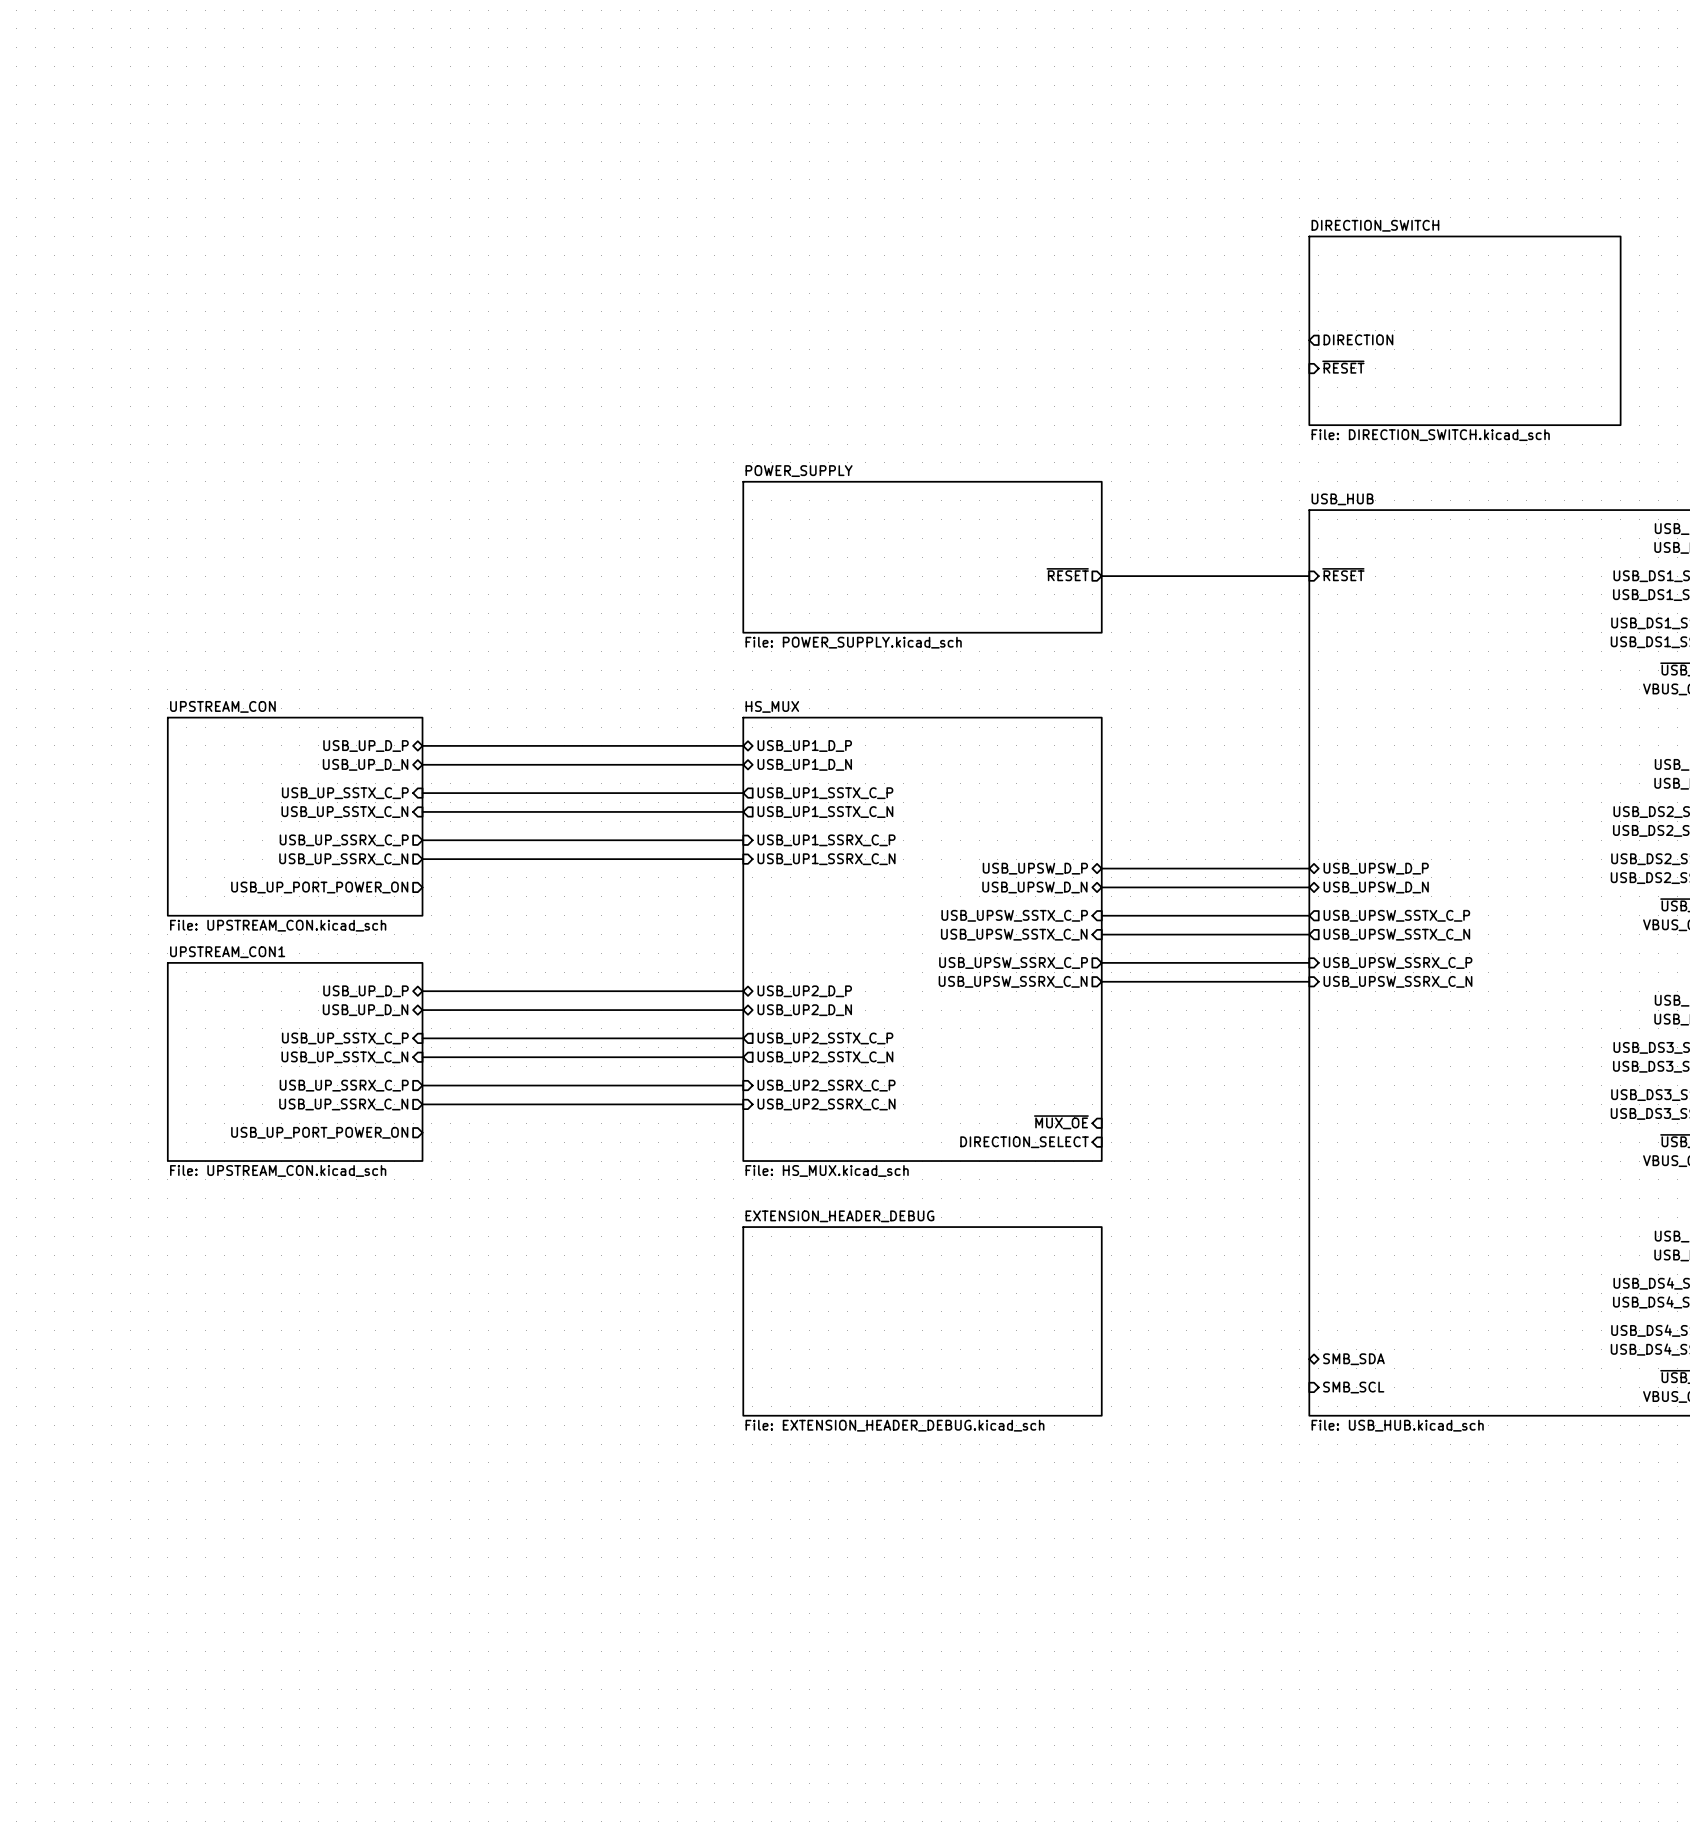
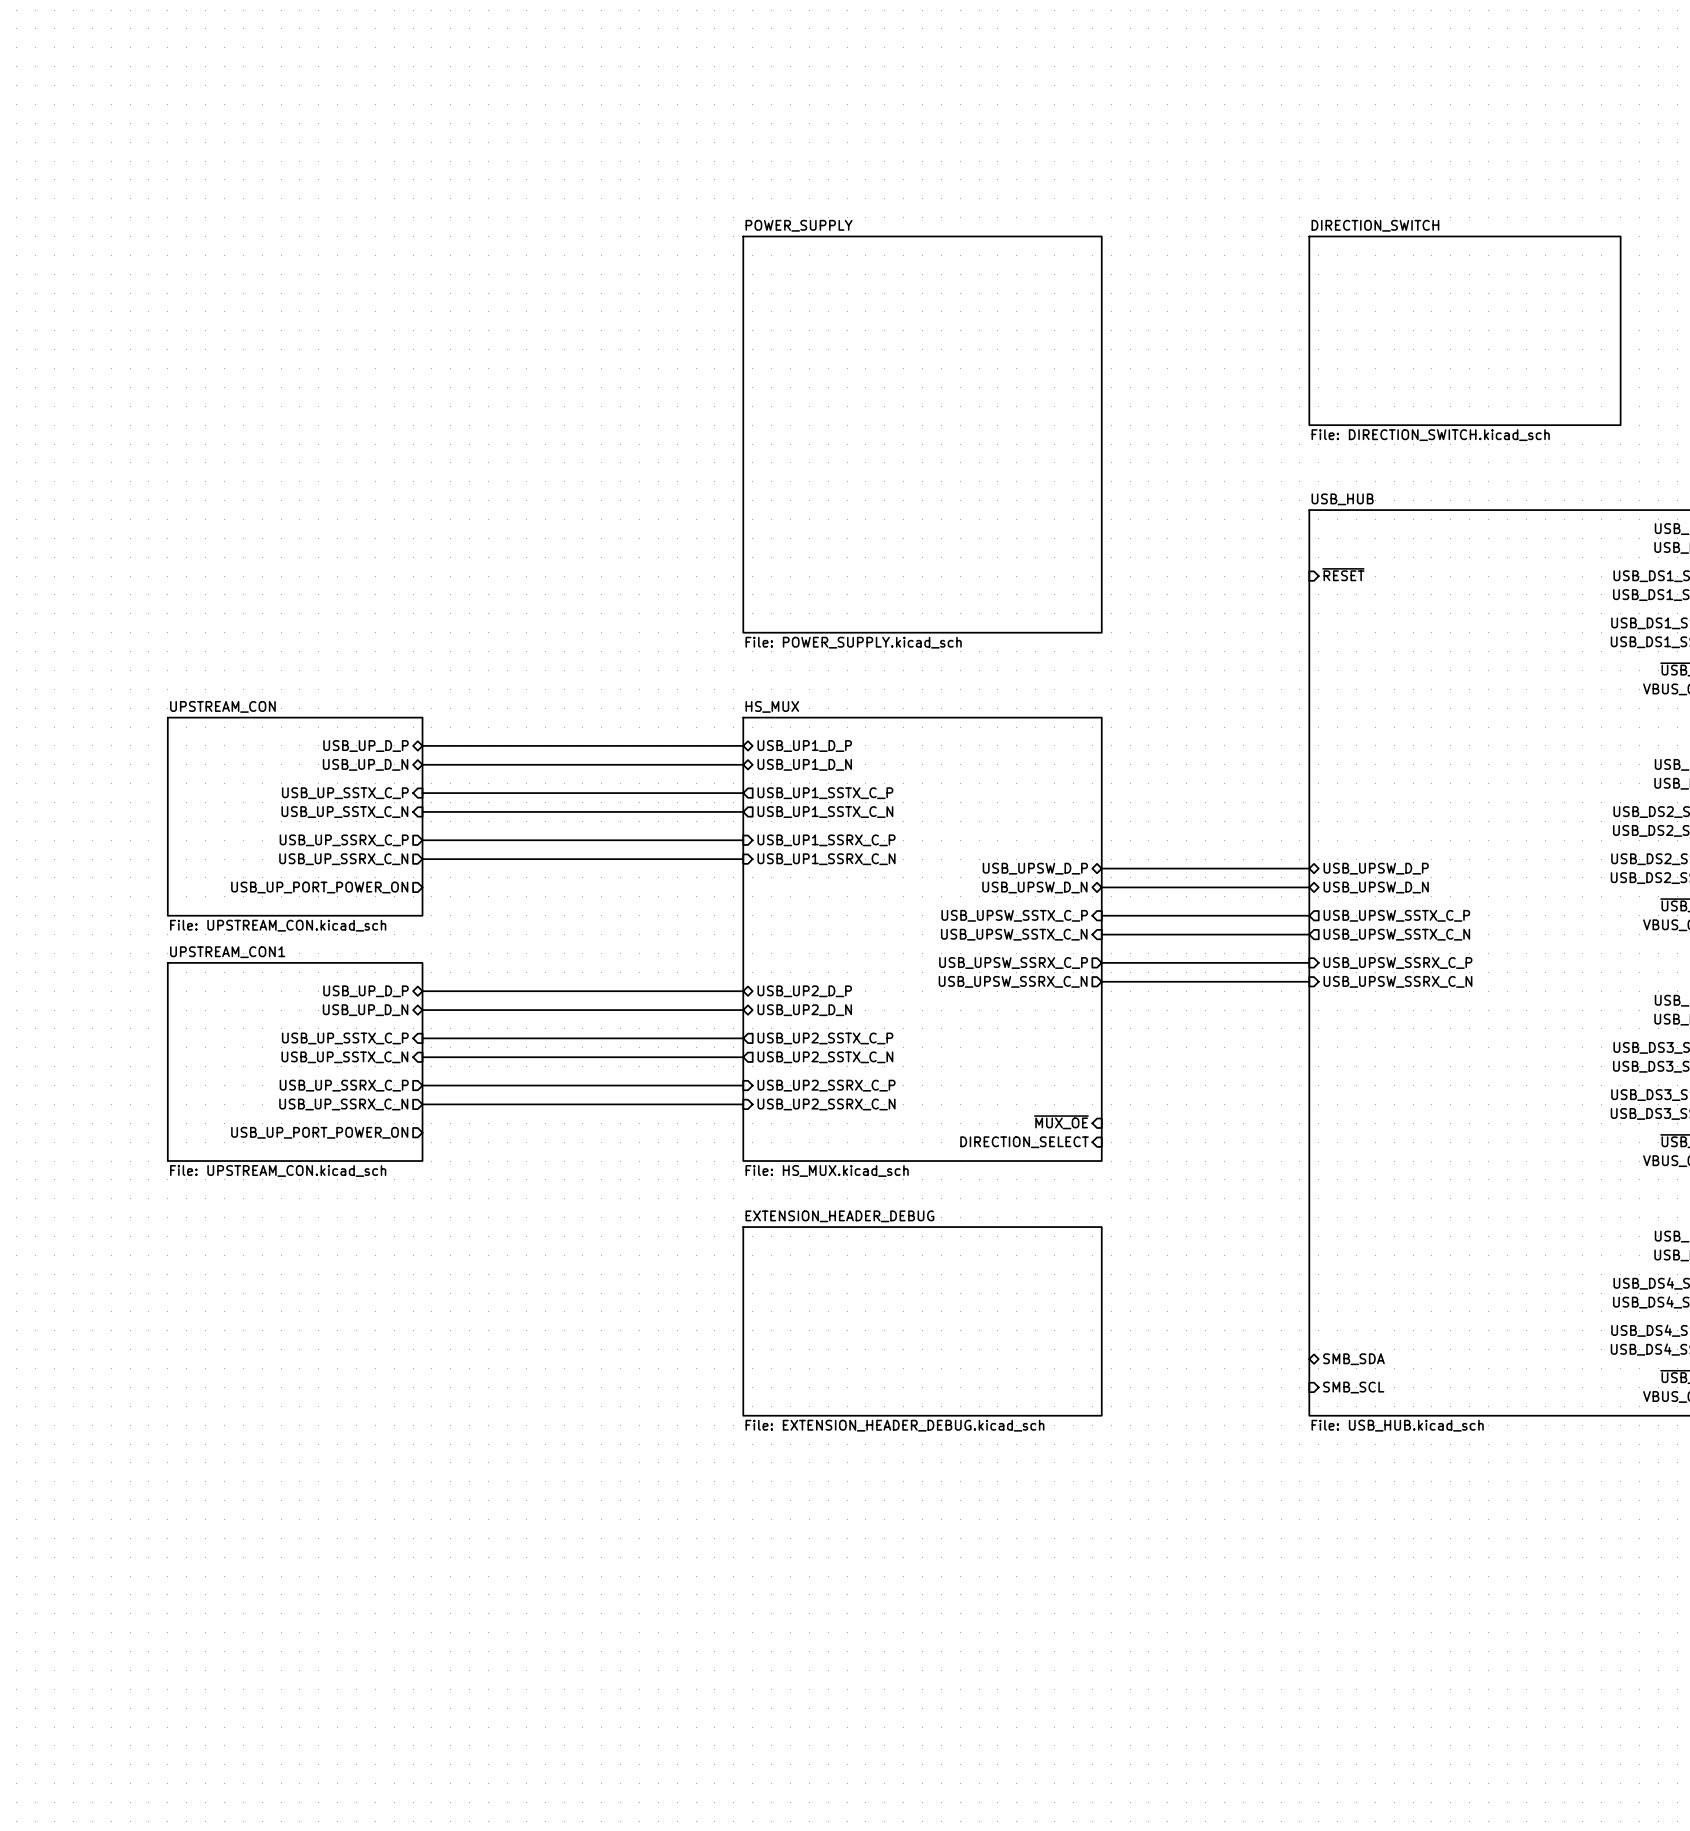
sheet pin: DIRECTION (1358, 339) -> none
sheet pin: ~{RESET} (1343, 367) -> none
sheet POWER_SUPPLY: none -> File: POWER_SUPPLY.kicad_sch (922, 434)
sheet POWER_SUPPLY: File: POWER_SUPPLY.kicad_sch (922, 557) -> none
sheet pin: ~{RESET} (1067, 574) -> none
wire: (1101, 576) (1309, 576) -> none

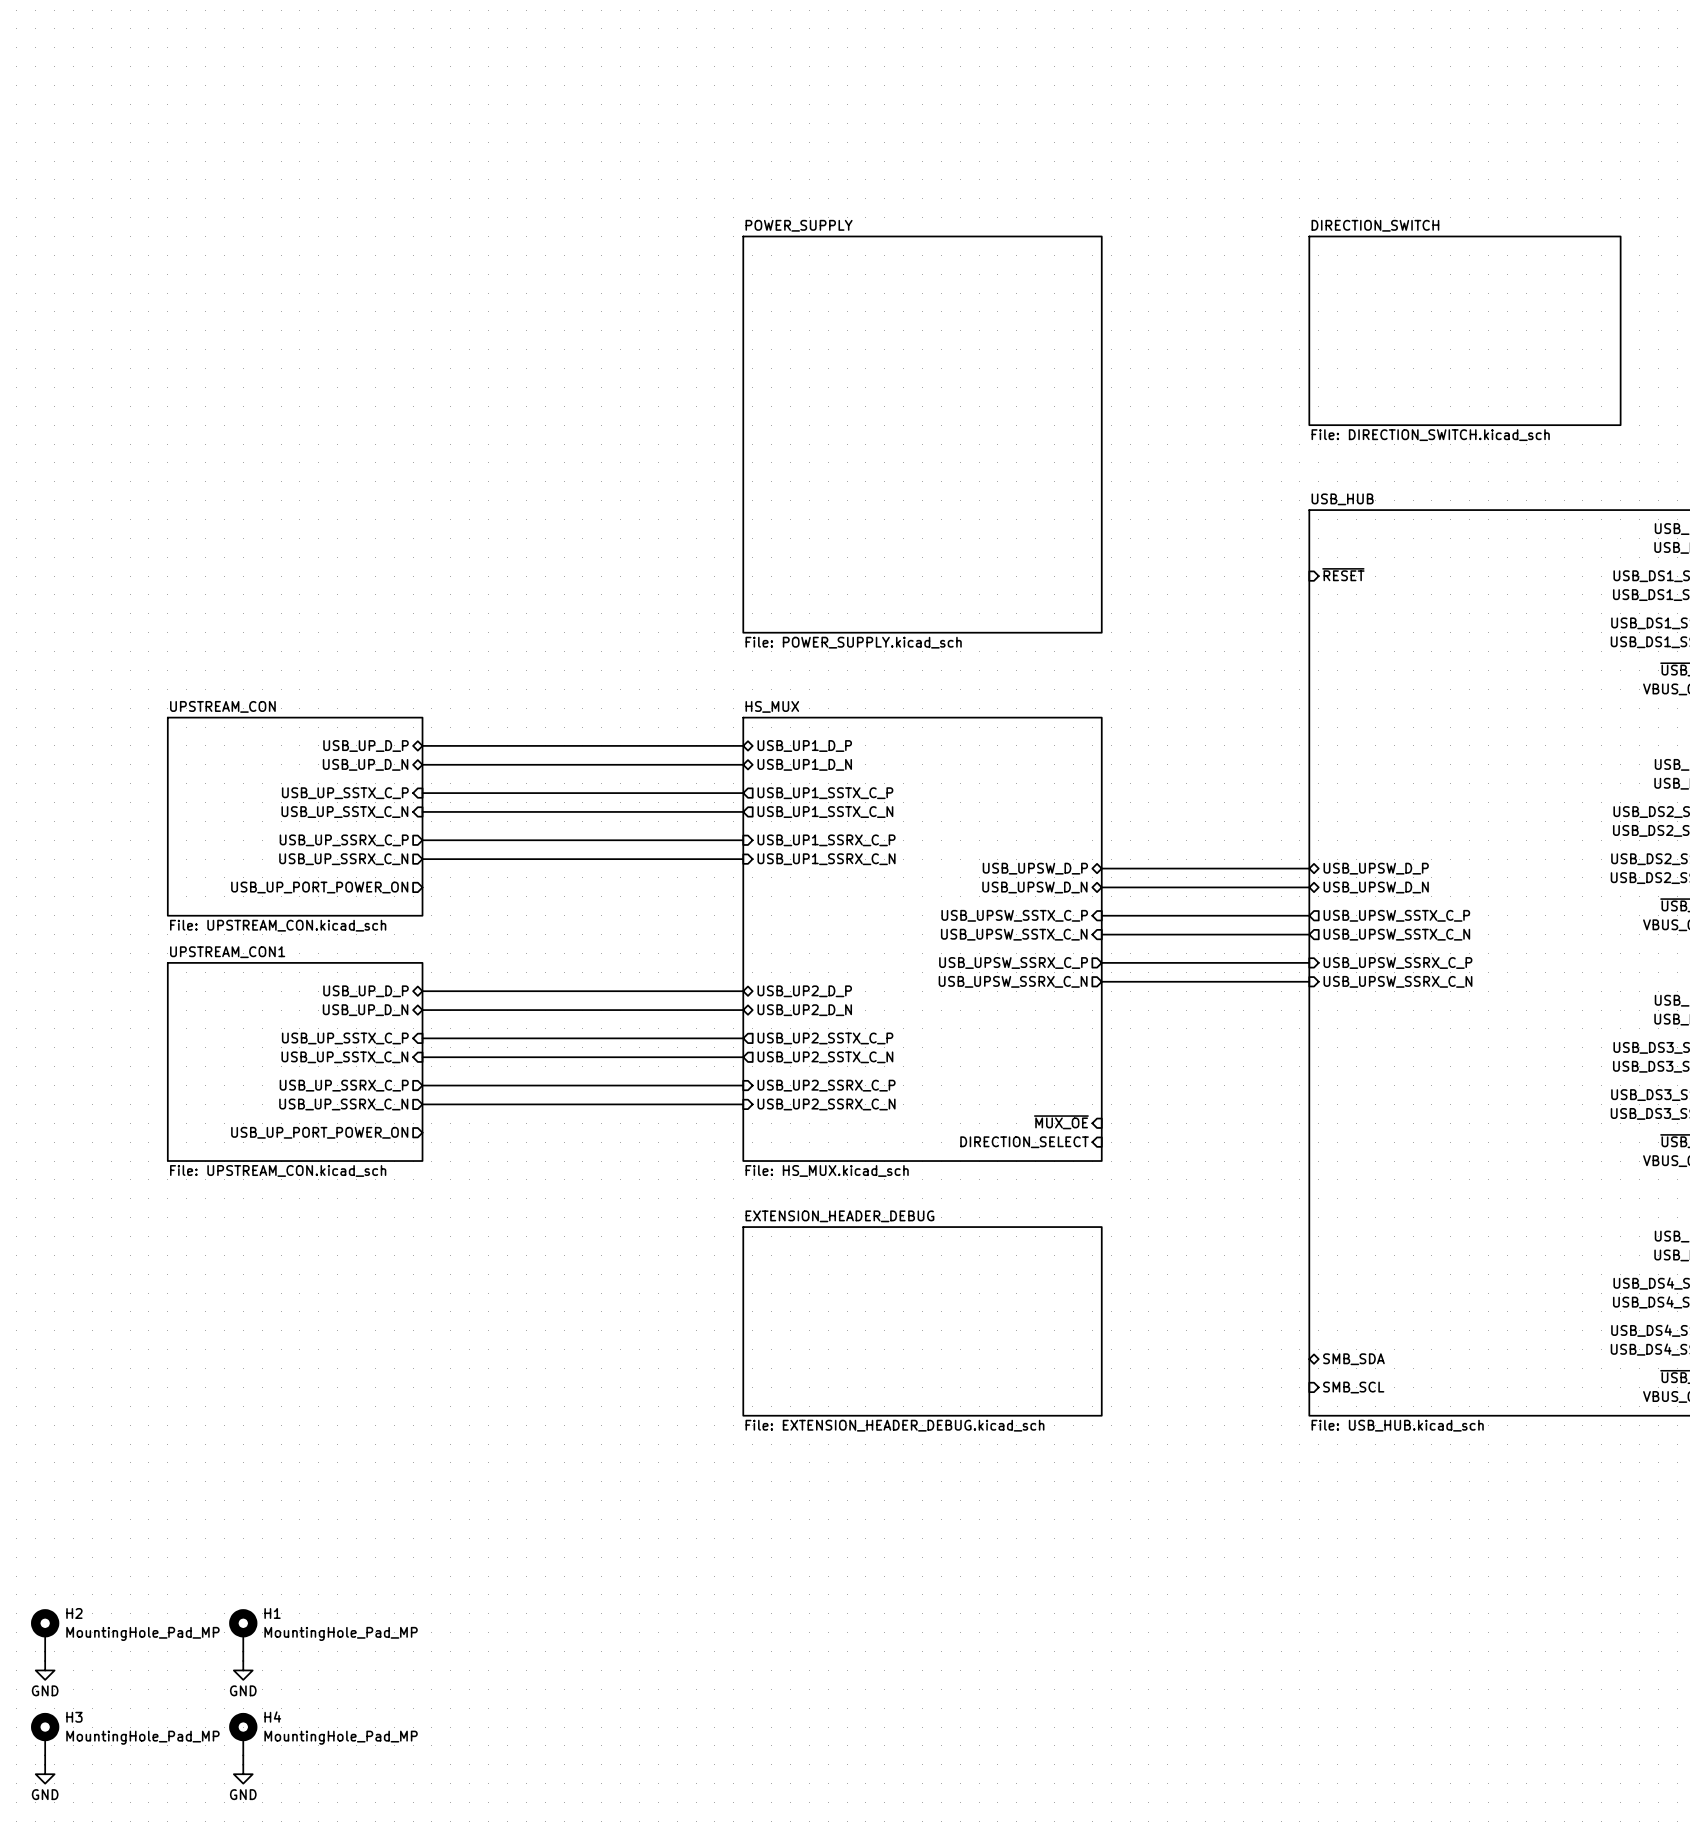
H2: none -> MountingHole_Pad_MP (45, 1630)
H1: none -> MountingHole_Pad_MP (243, 1630)
wire: none -> (45, 1651) (45, 1661)
wire: none -> (243, 1651) (243, 1661)
power symbol: none -> GND (45, 1670)
power symbol: none -> GND (243, 1670)
H3: none -> MountingHole_Pad_MP (45, 1734)
H4: none -> MountingHole_Pad_MP (243, 1734)
wire: none -> (45, 1755) (45, 1764)
wire: none -> (243, 1755) (243, 1764)
power symbol: none -> GND (45, 1774)
power symbol: none -> GND (243, 1774)

